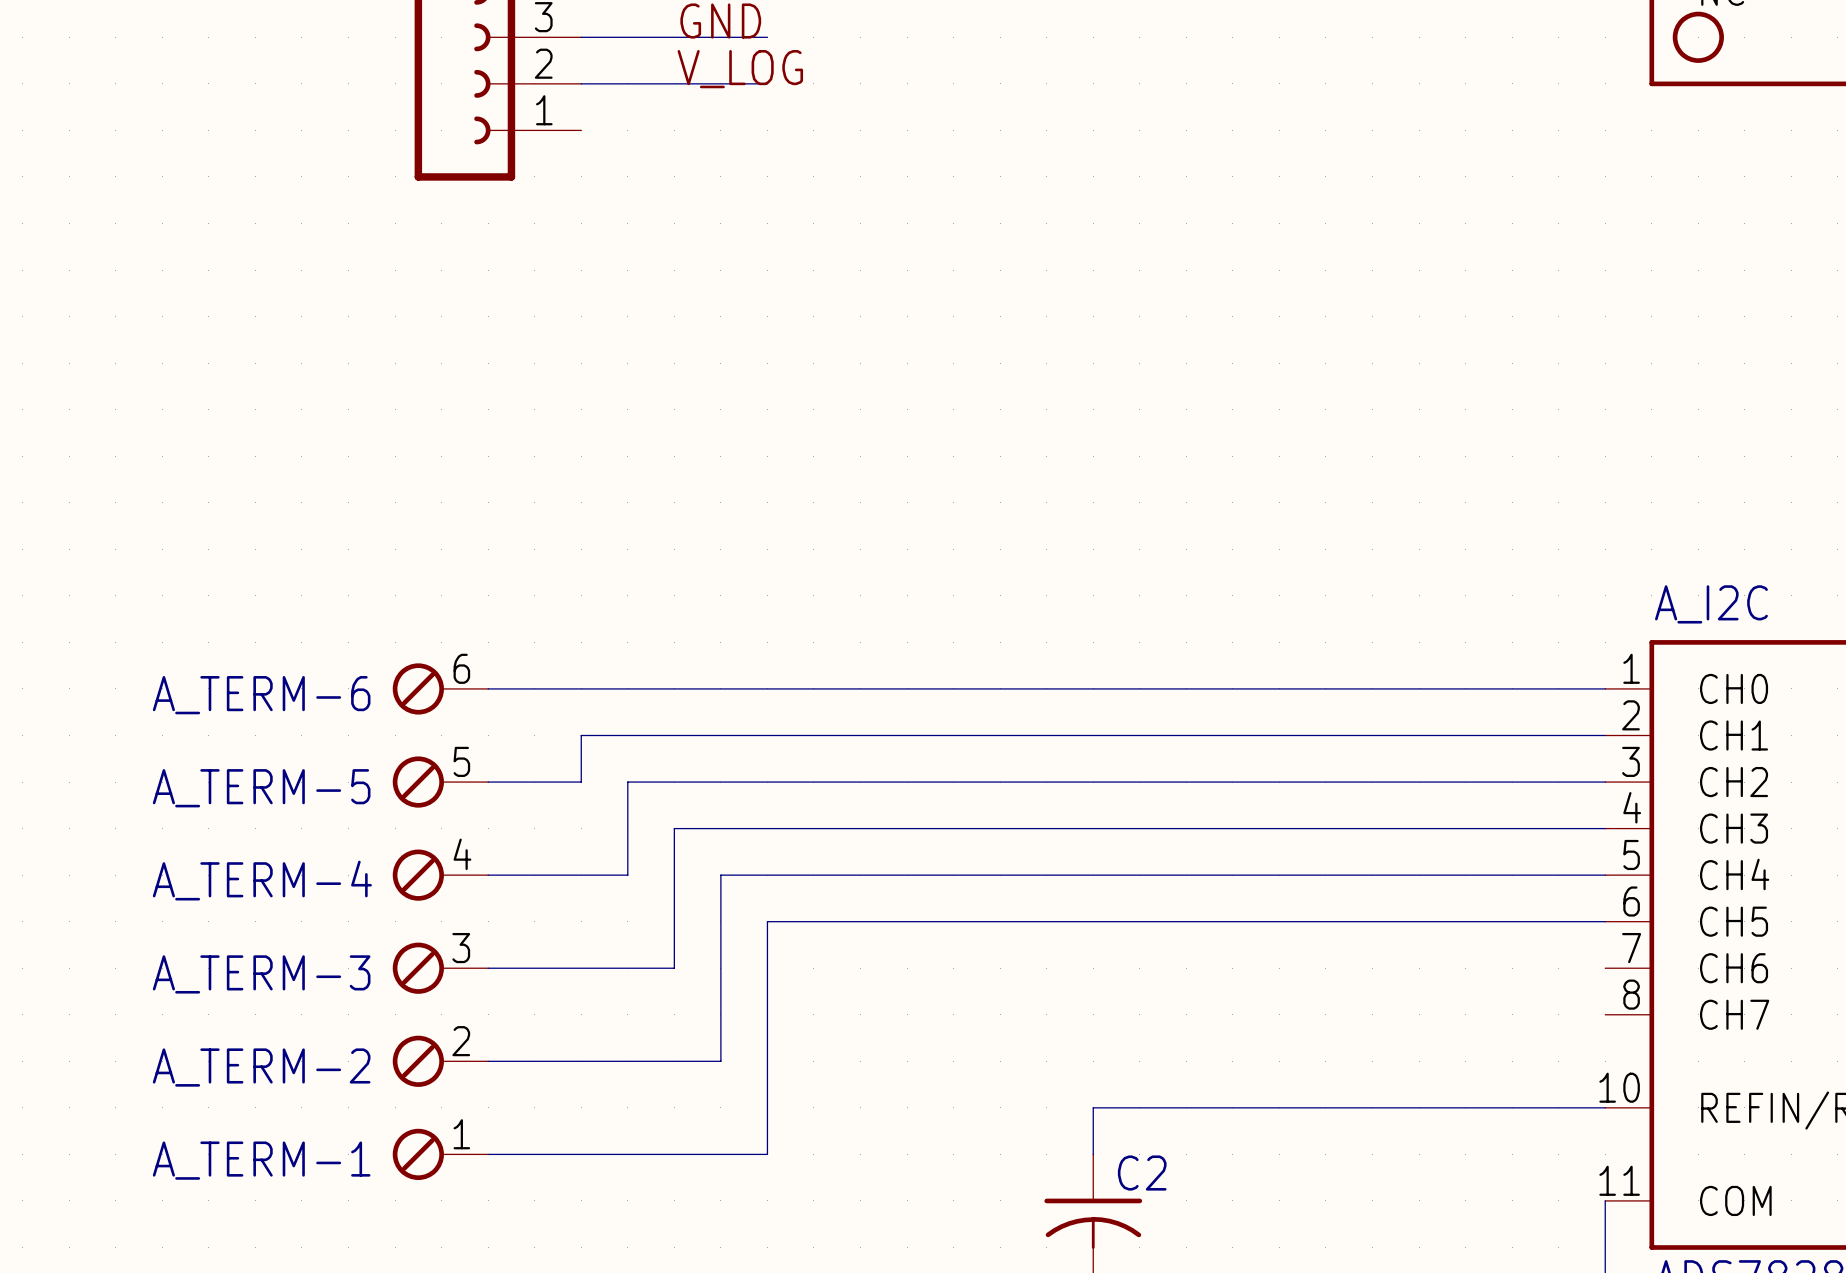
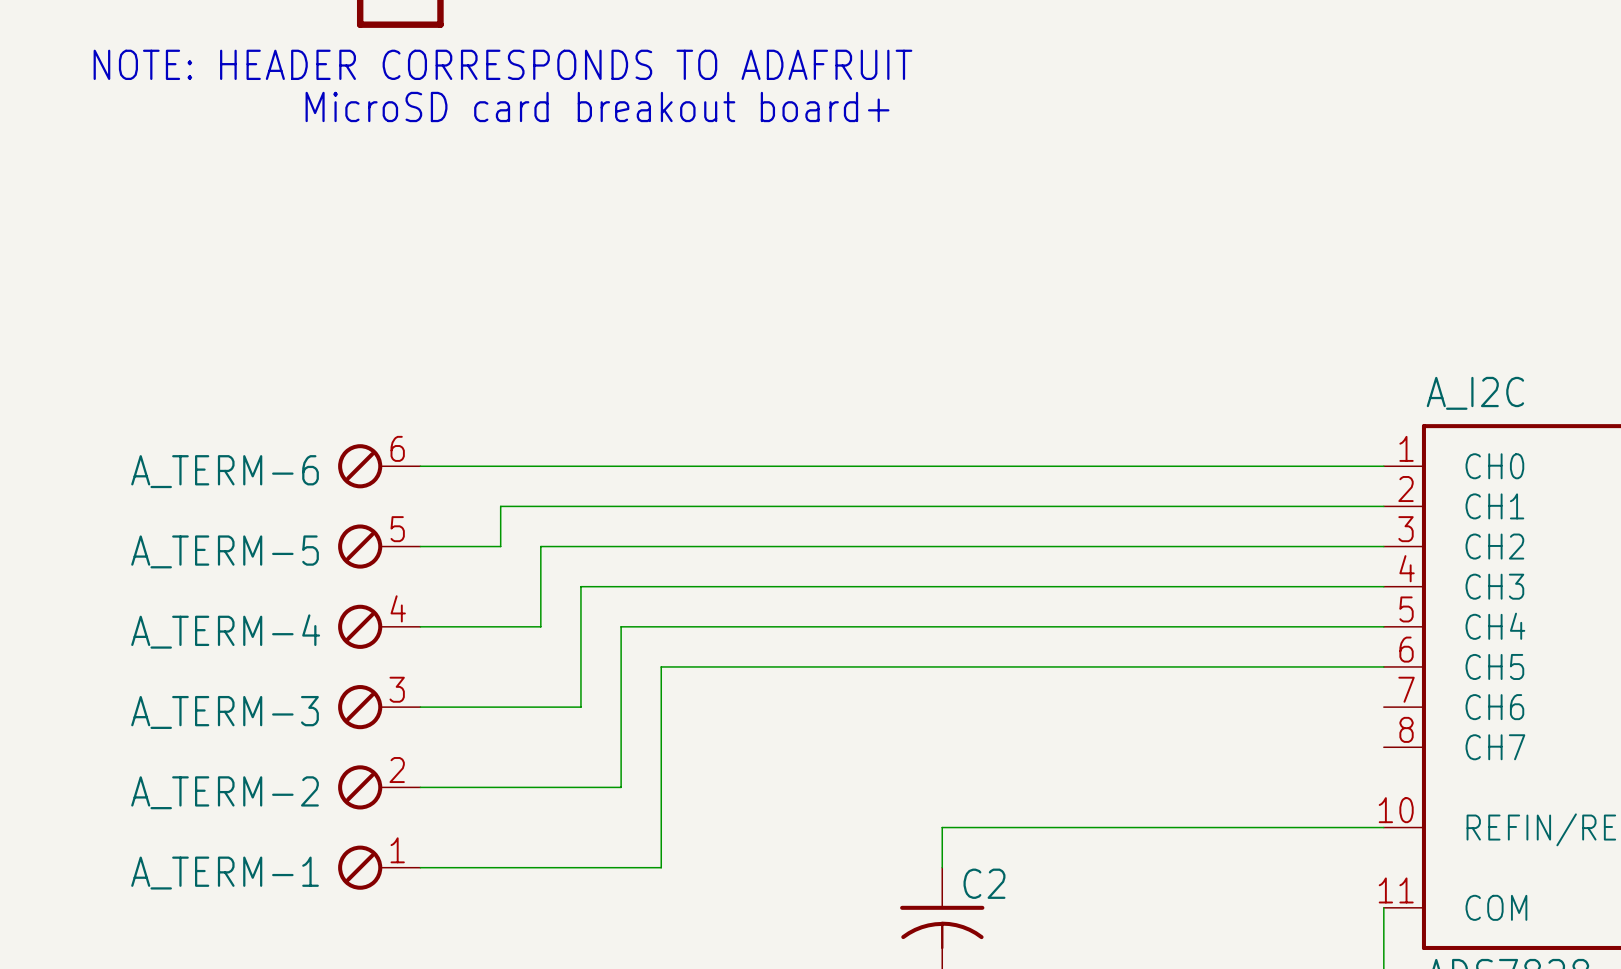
text: none -> NOTE: HEADER CORRESPONDS TO ADAFRUIT (502, 64)
text: none -> MicroSD card breakout board+ (597, 106)

